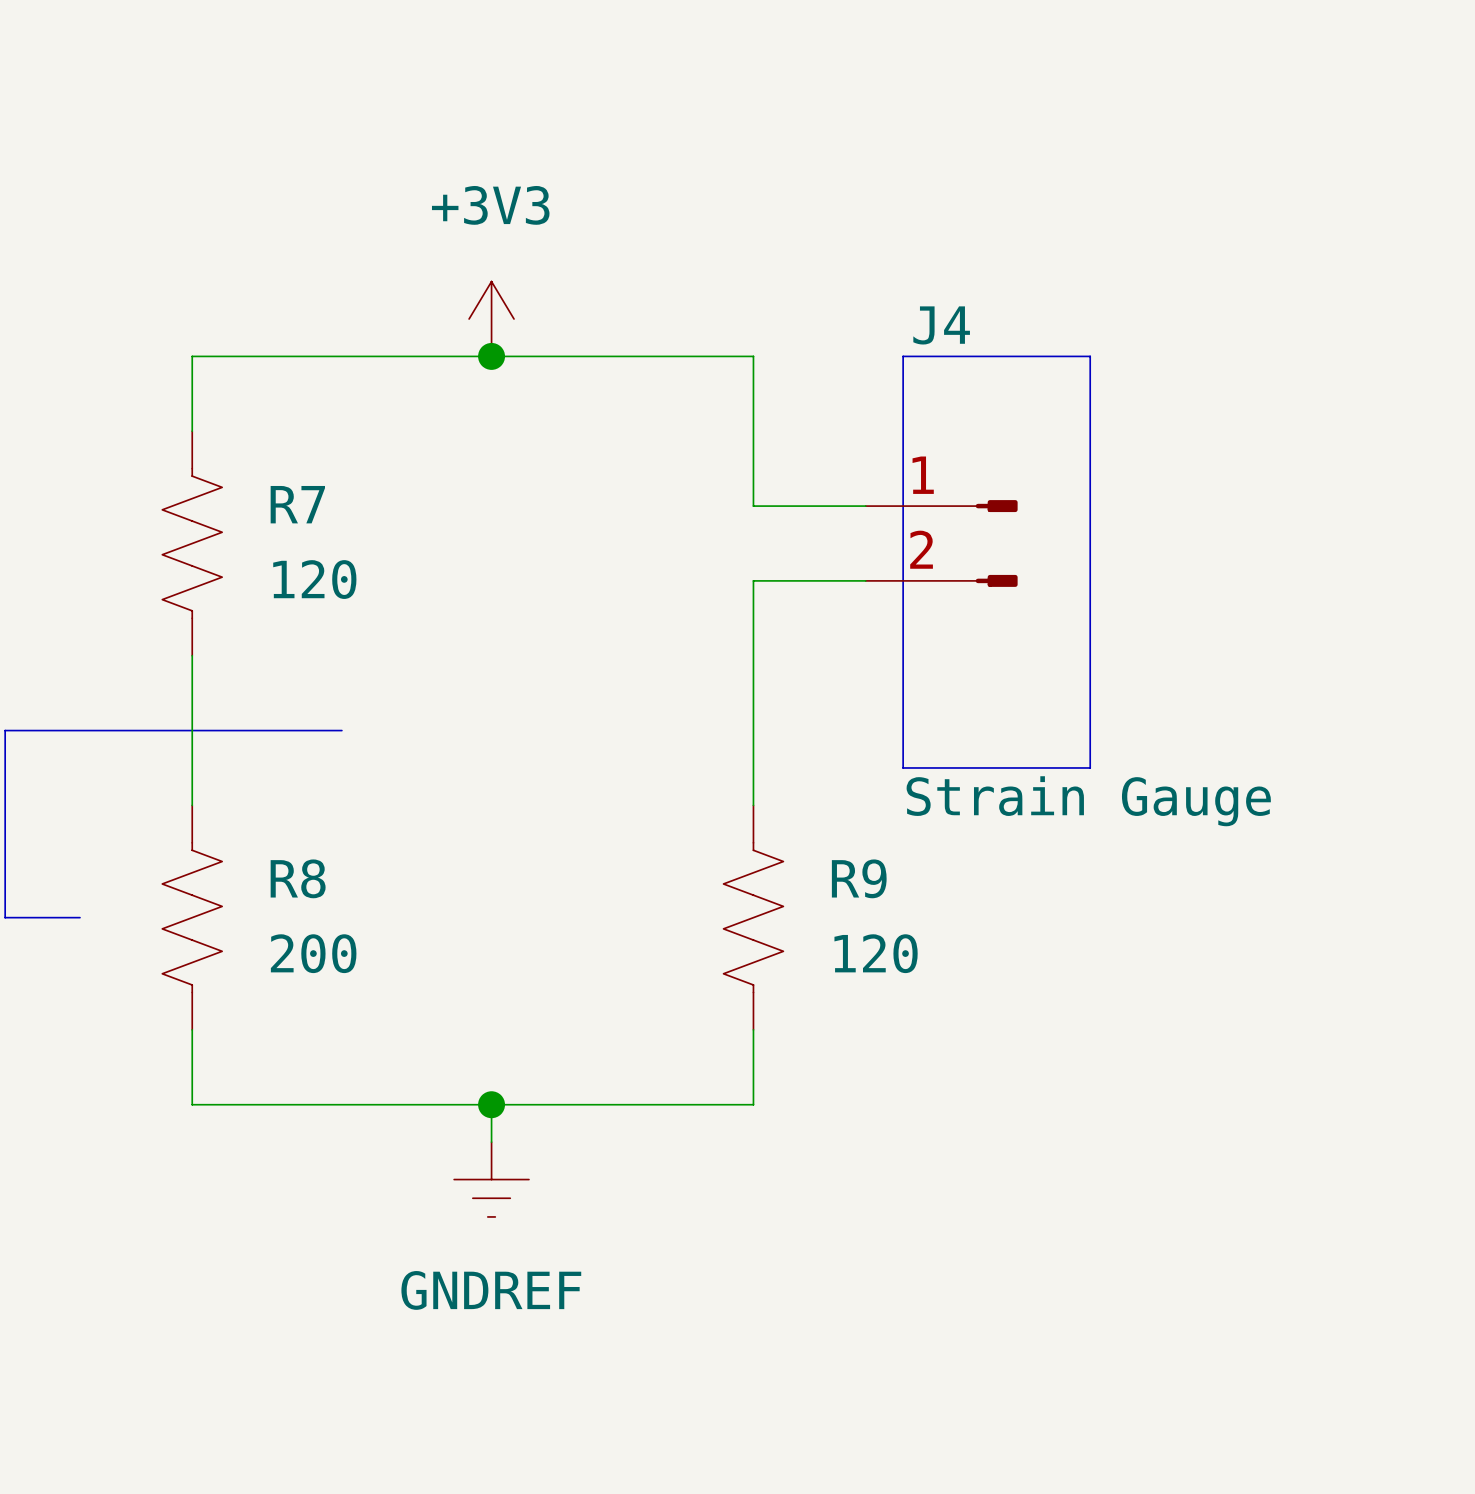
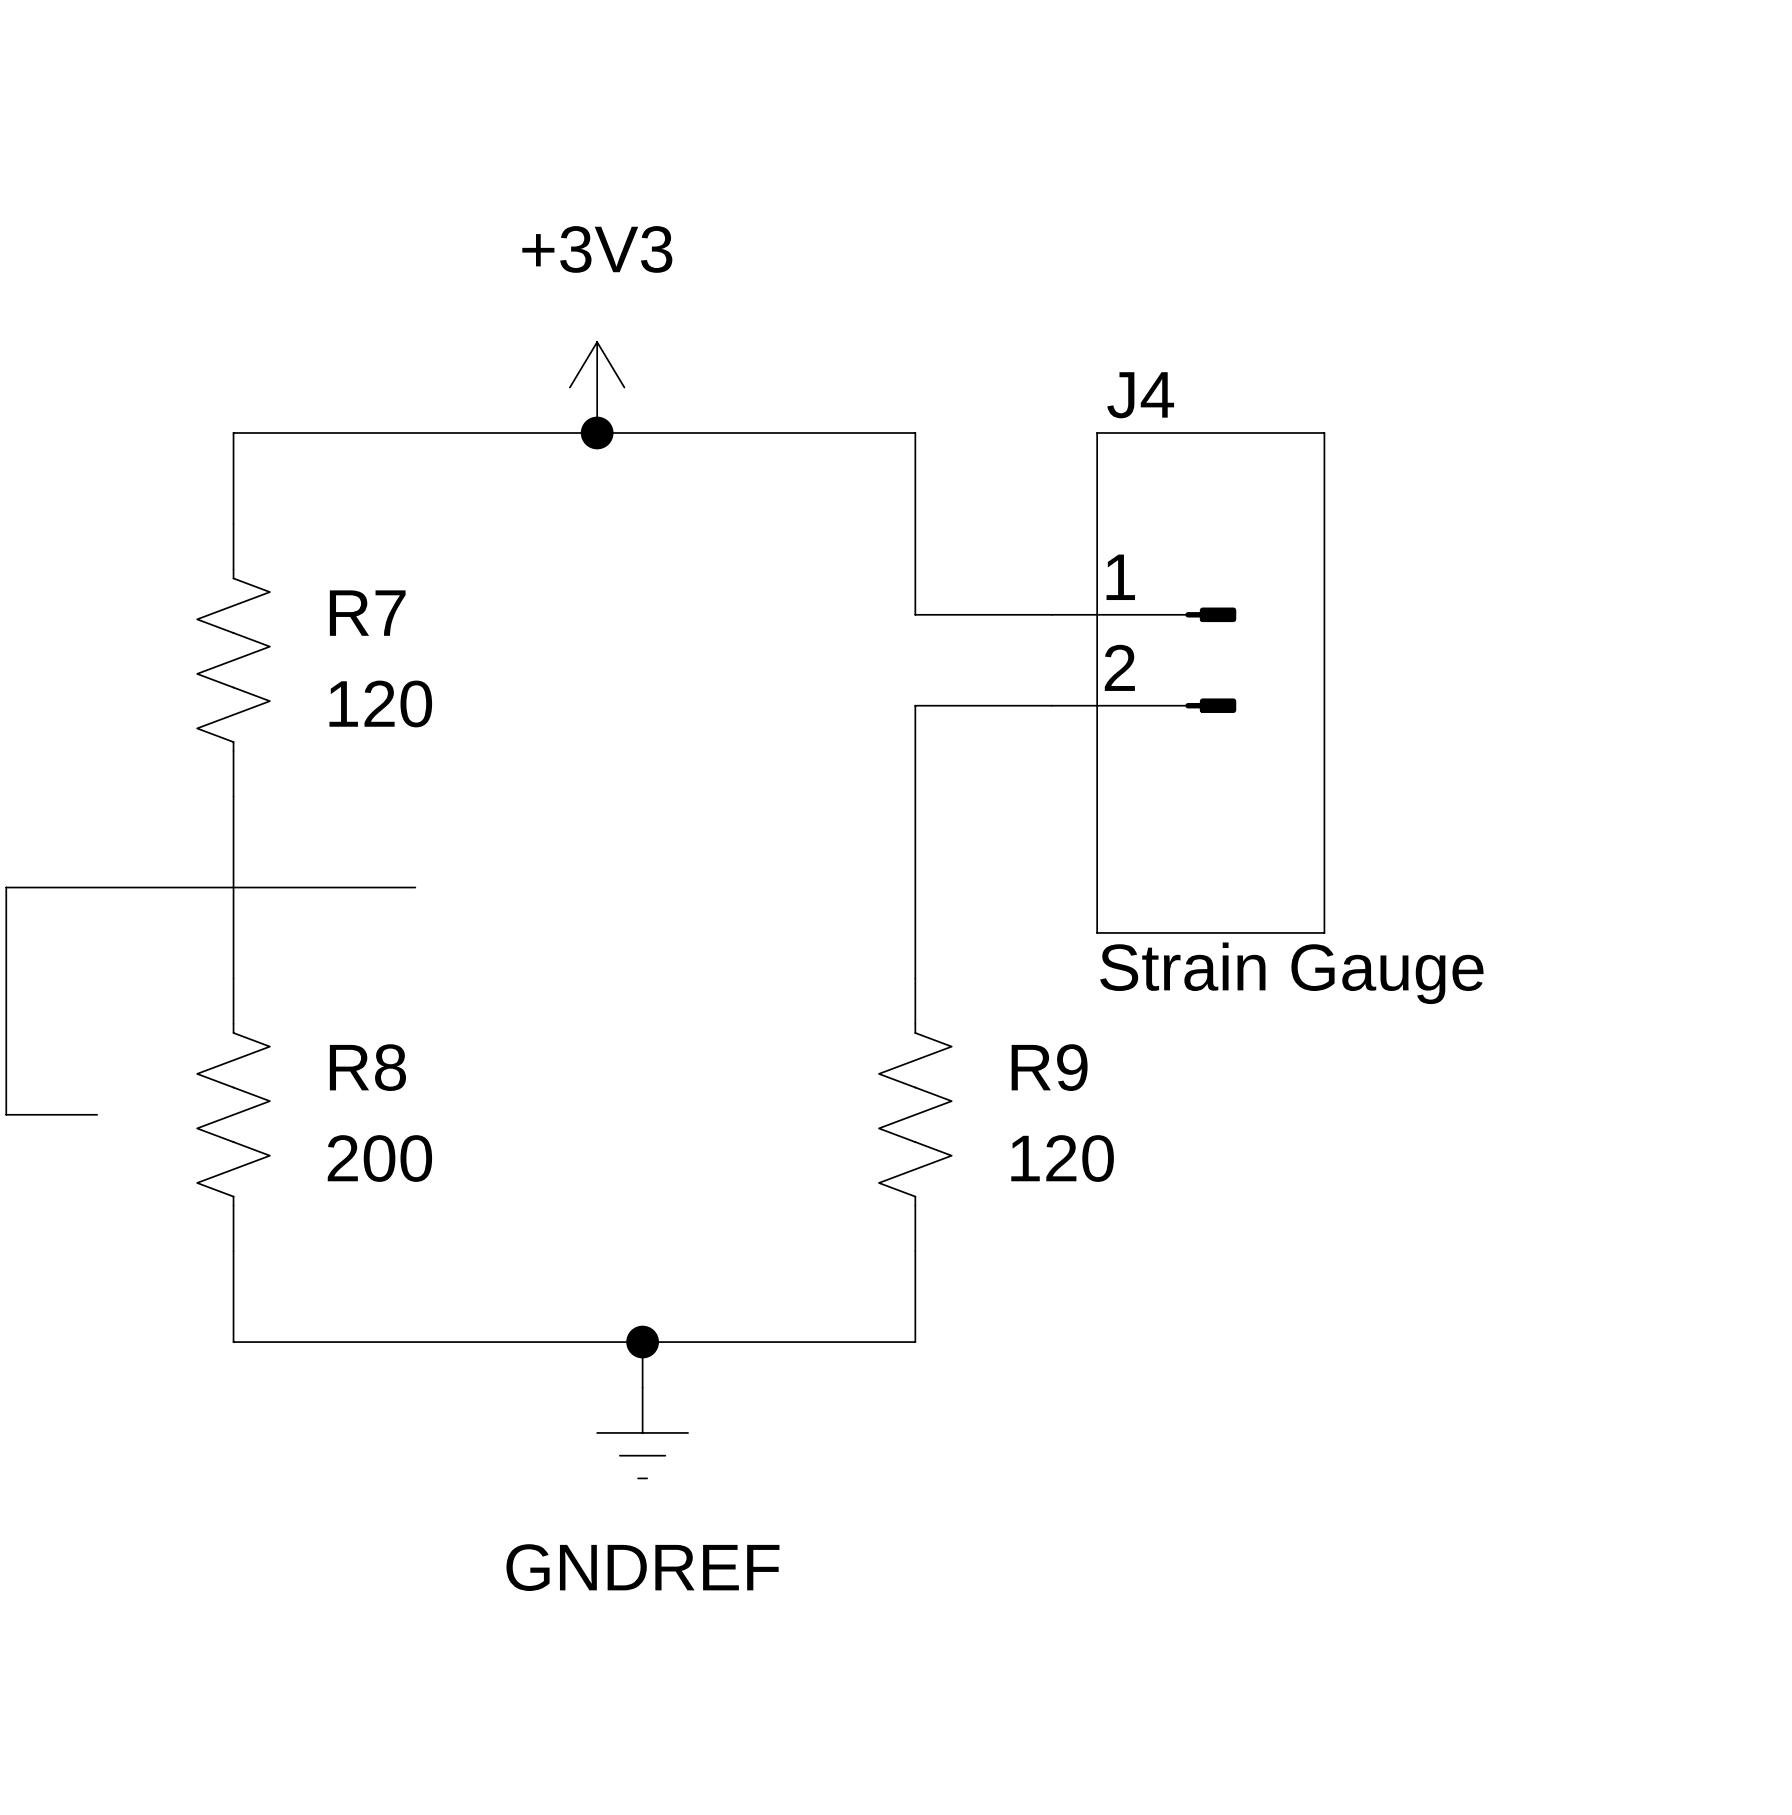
wire: (491, 1104) (491, 1142) -> (642, 1342) (642, 1387)
junction position: (491, 1104) -> (642, 1342)
power symbol position: GNDREF (491, 1179) -> GNDREF (642, 1432)

